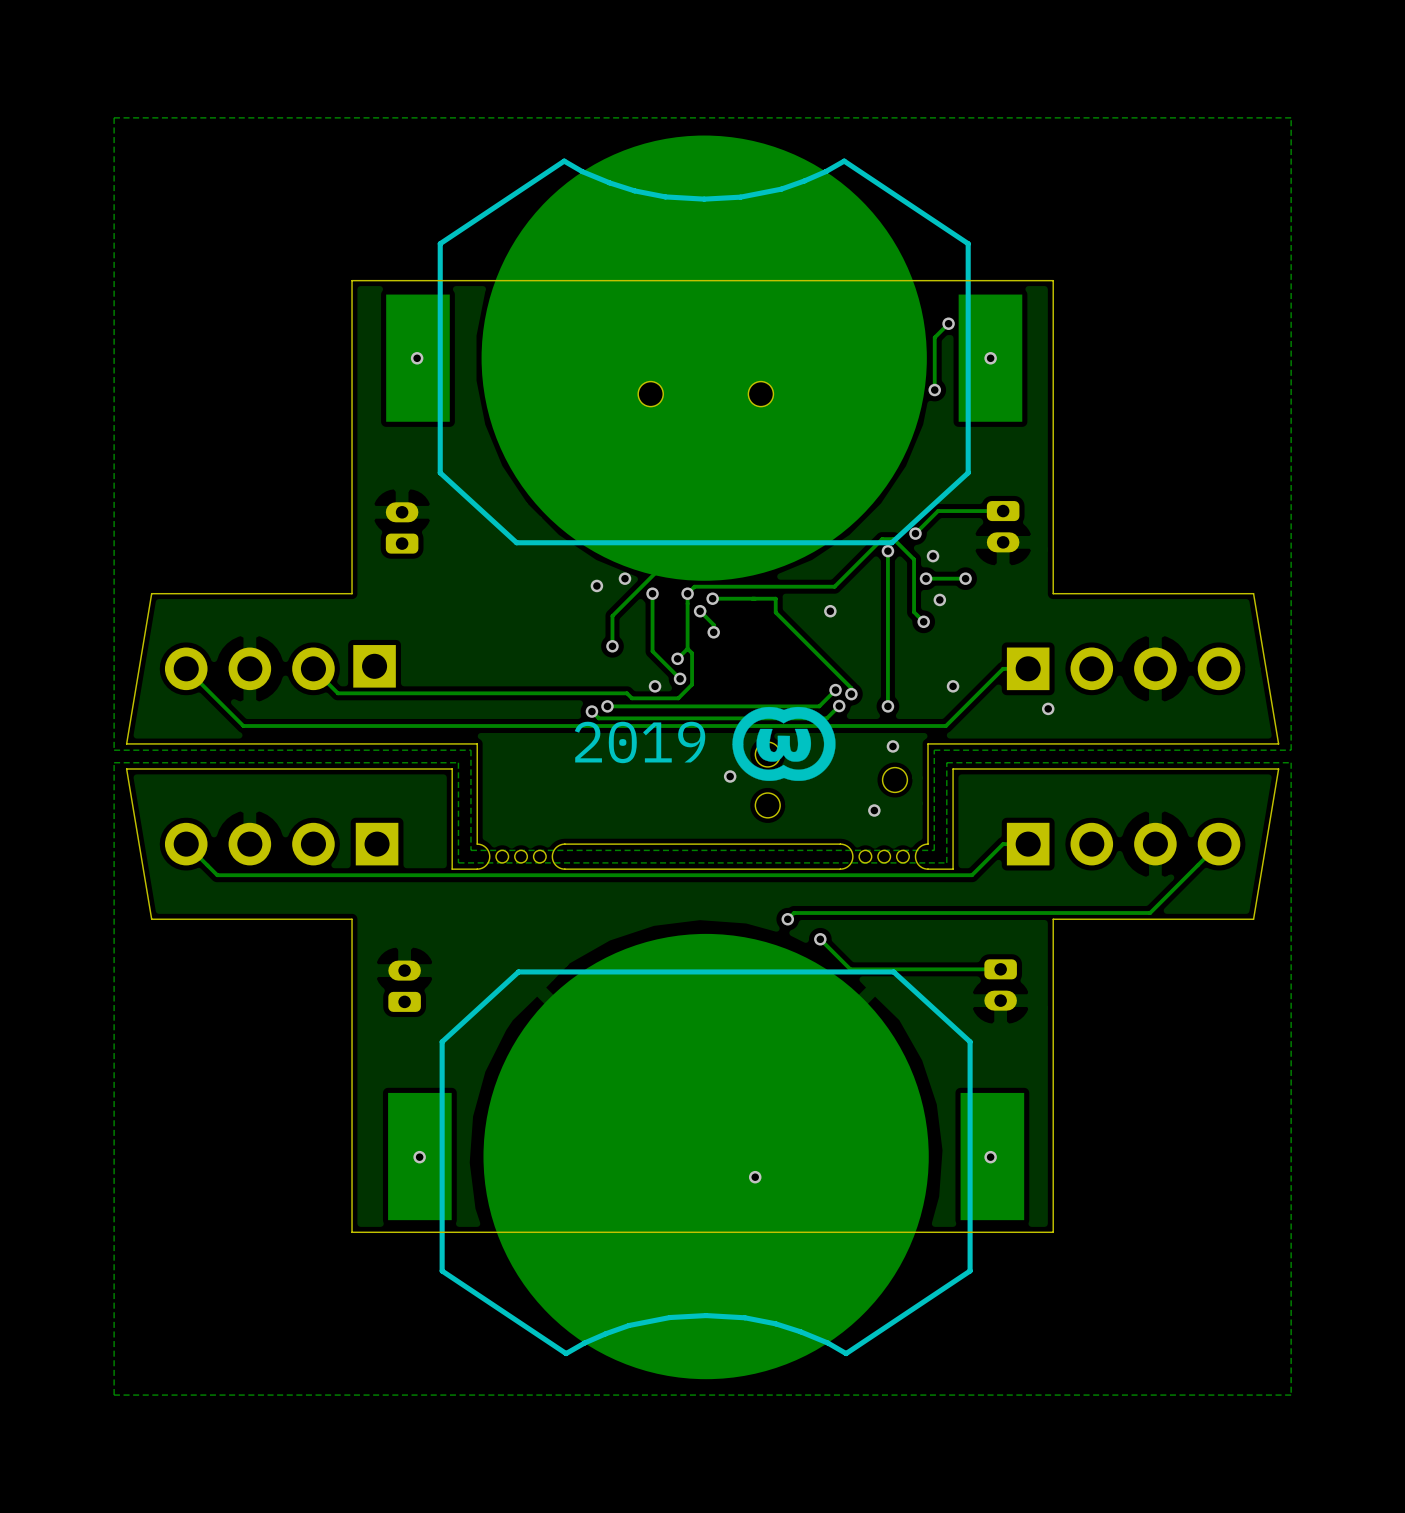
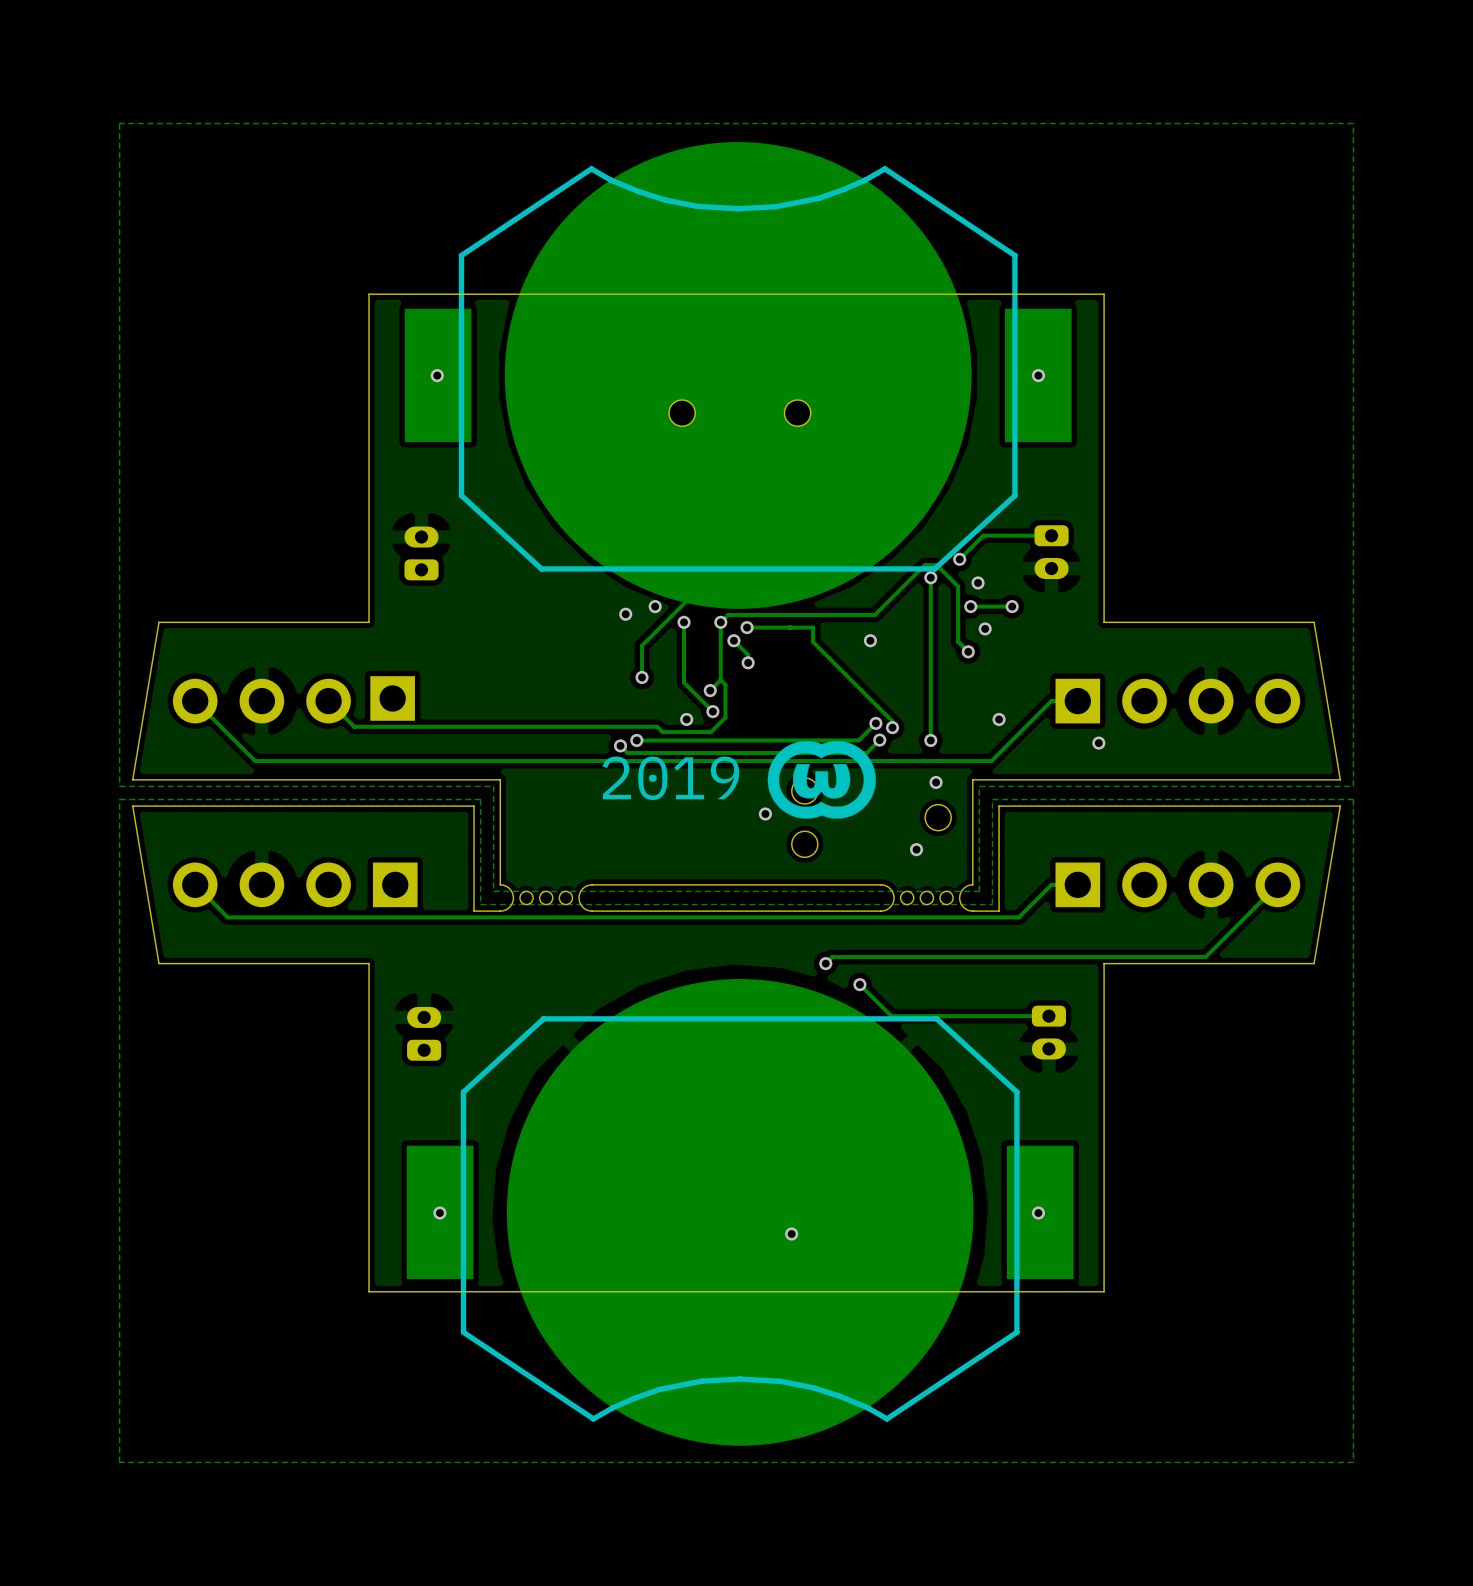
track: (948, 323) (934, 337) (934, 390) -> none
via: (948, 323) -> none
via: (934, 390) -> none

